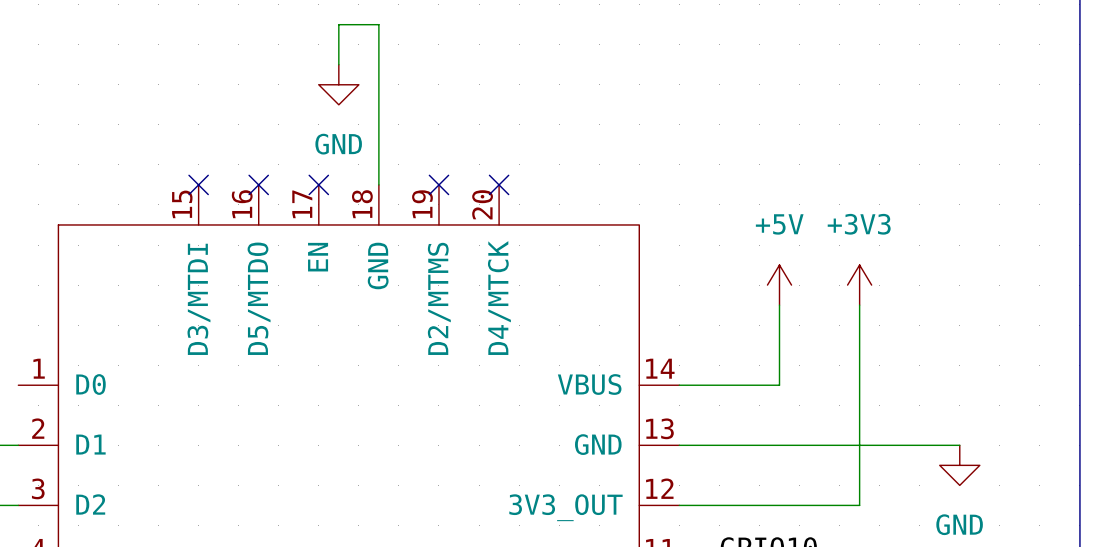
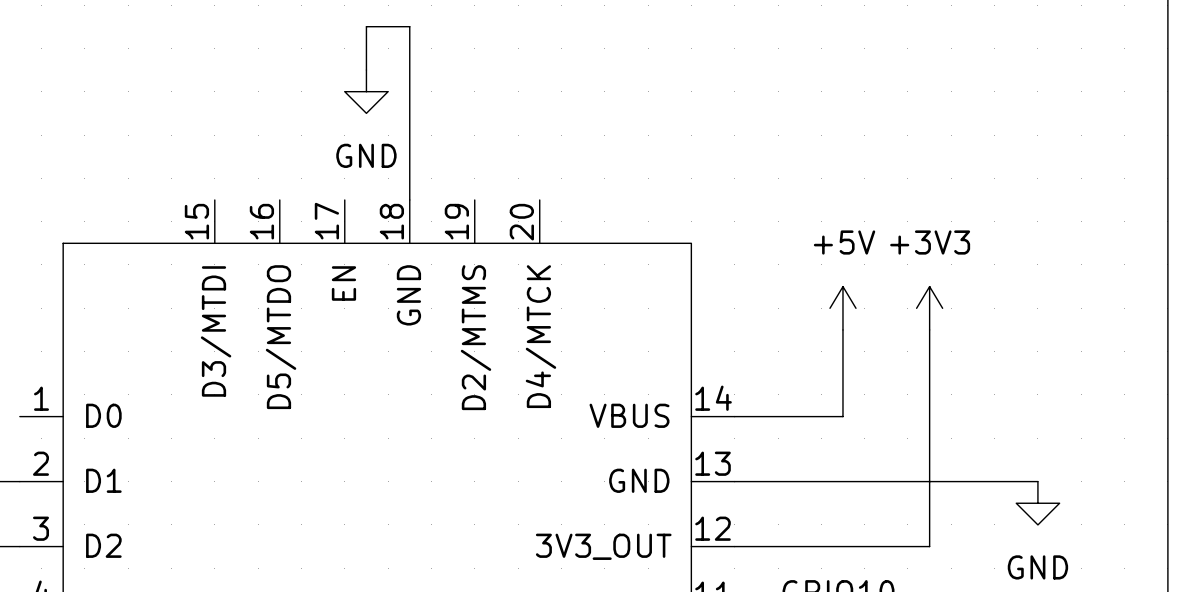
no-connect mark: (198, 184) -> none
no-connect mark: (258, 184) -> none
no-connect mark: (318, 184) -> none
no-connect mark: (438, 184) -> none
no-connect mark: (499, 184) -> none

